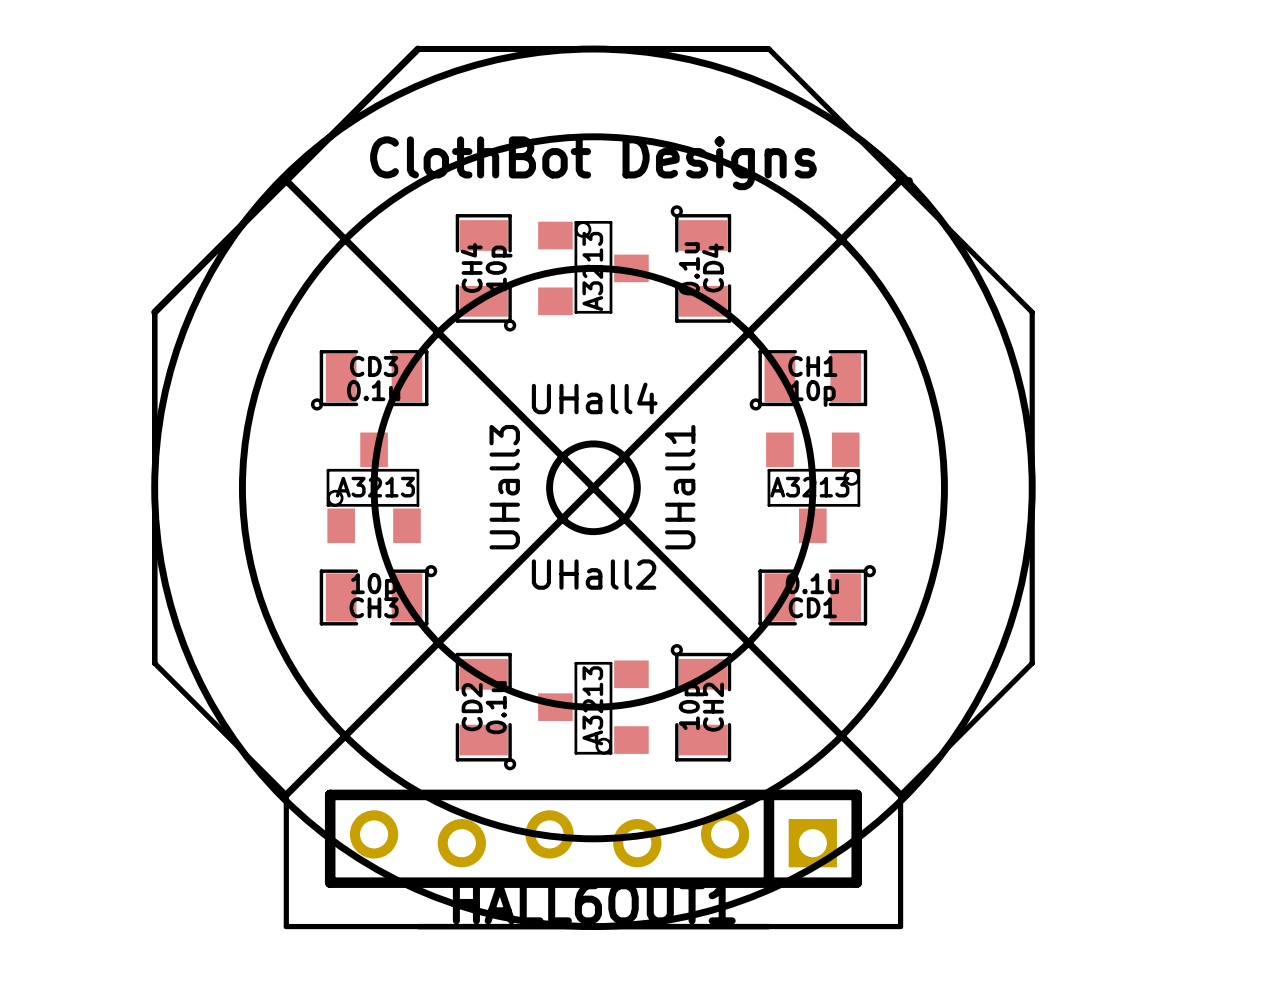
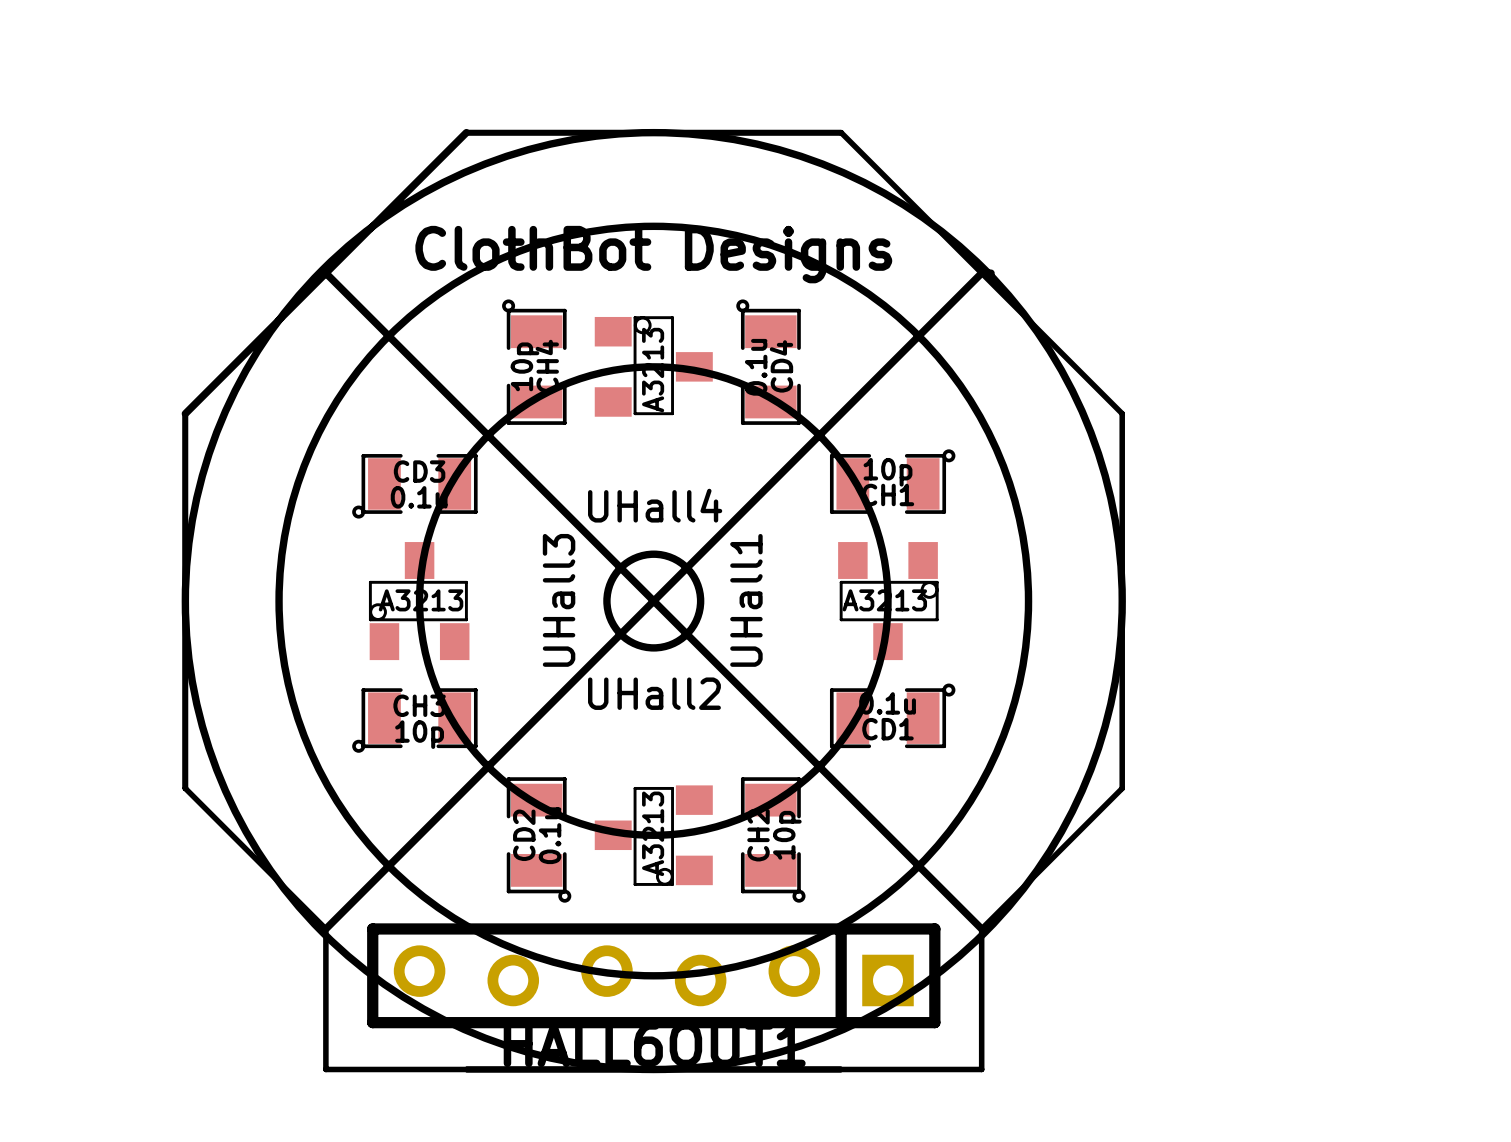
CH4 rotation: 0° (485, 272) -> 180° (534, 362)
CH1 rotation: 0° (808, 380) -> 180° (892, 481)
CH3 rotation: 0° (378, 595) -> 180° (414, 720)
CH2 rotation: 0° (700, 702) -> 180° (773, 839)

